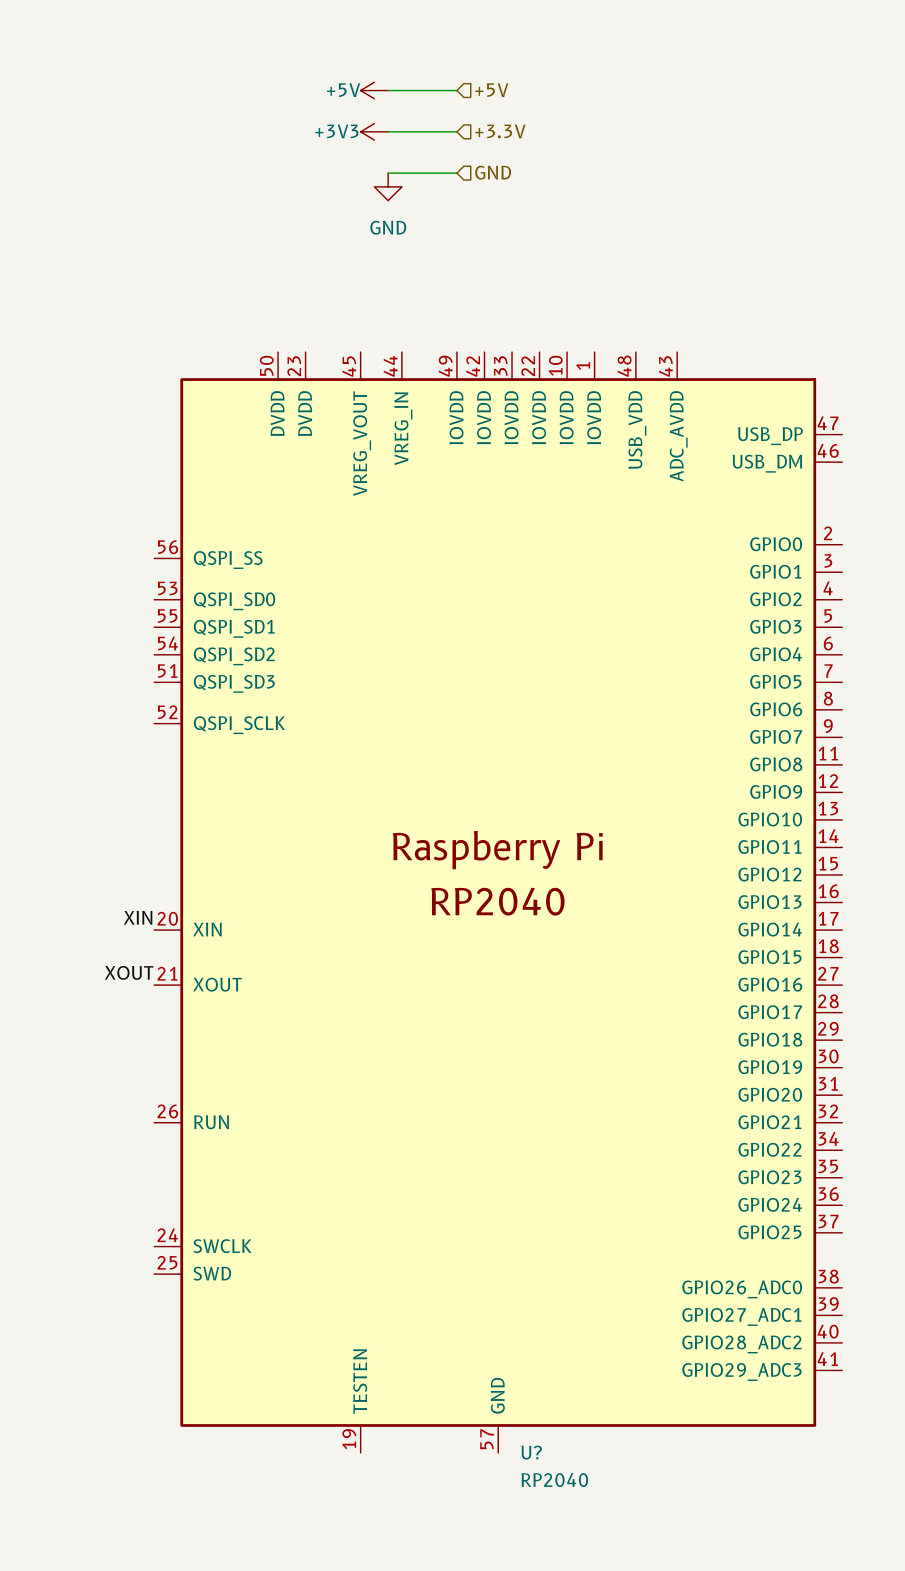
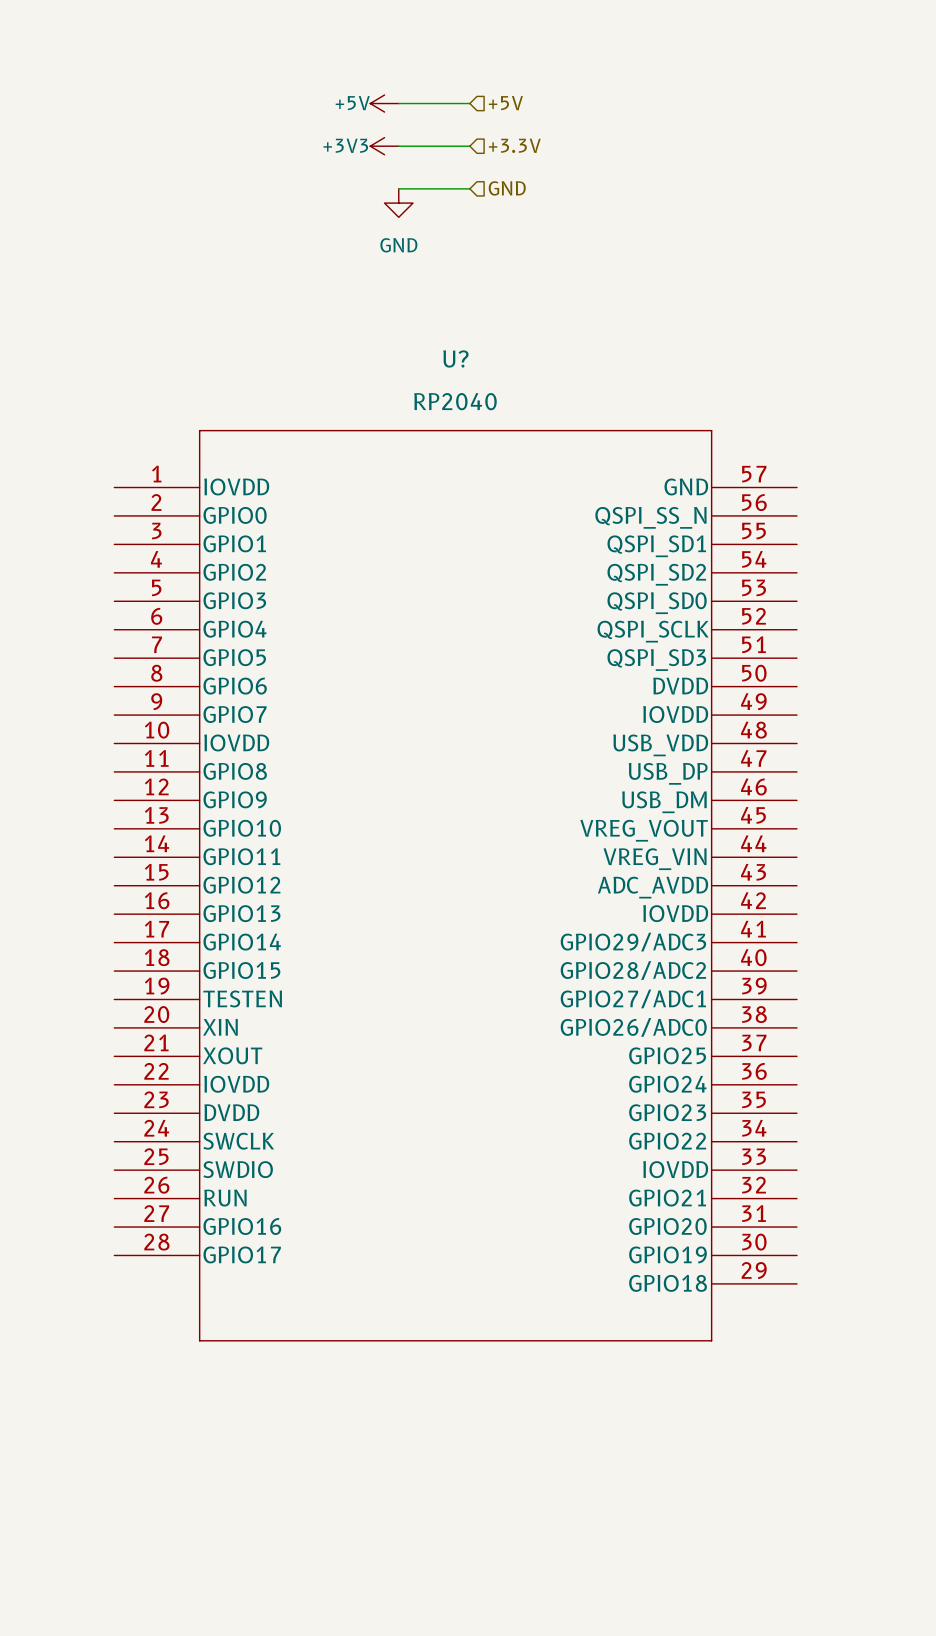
U?: none -> RP2040 (455, 885)
U?: RP2040 (498, 902) -> none
label: XIN (138, 917) -> none
label: XOUT (129, 972) -> none

